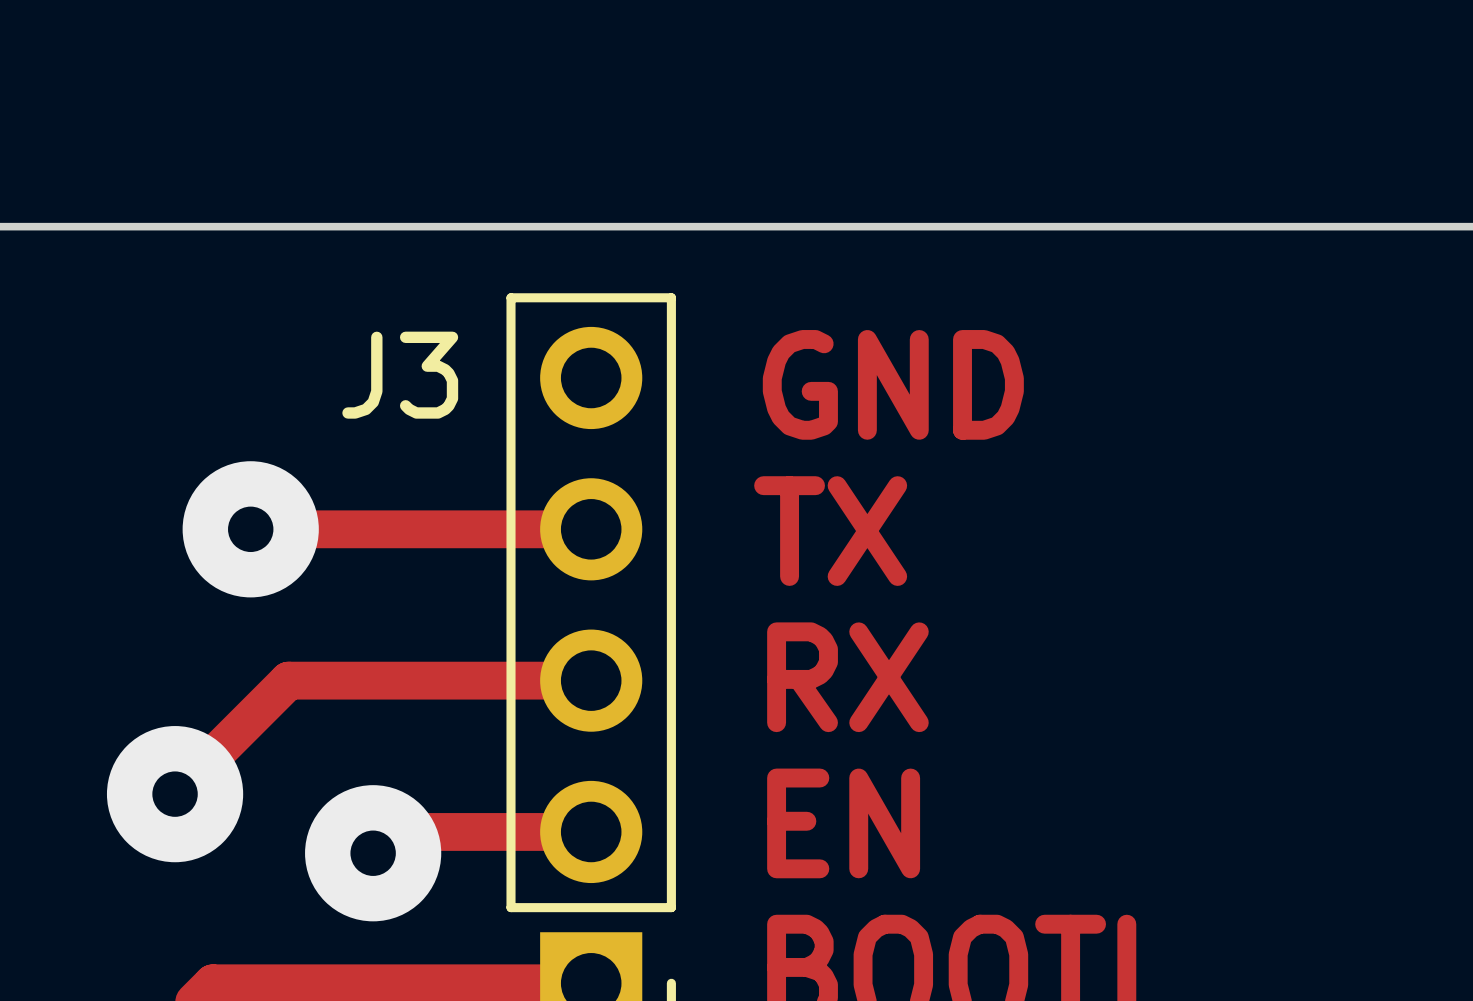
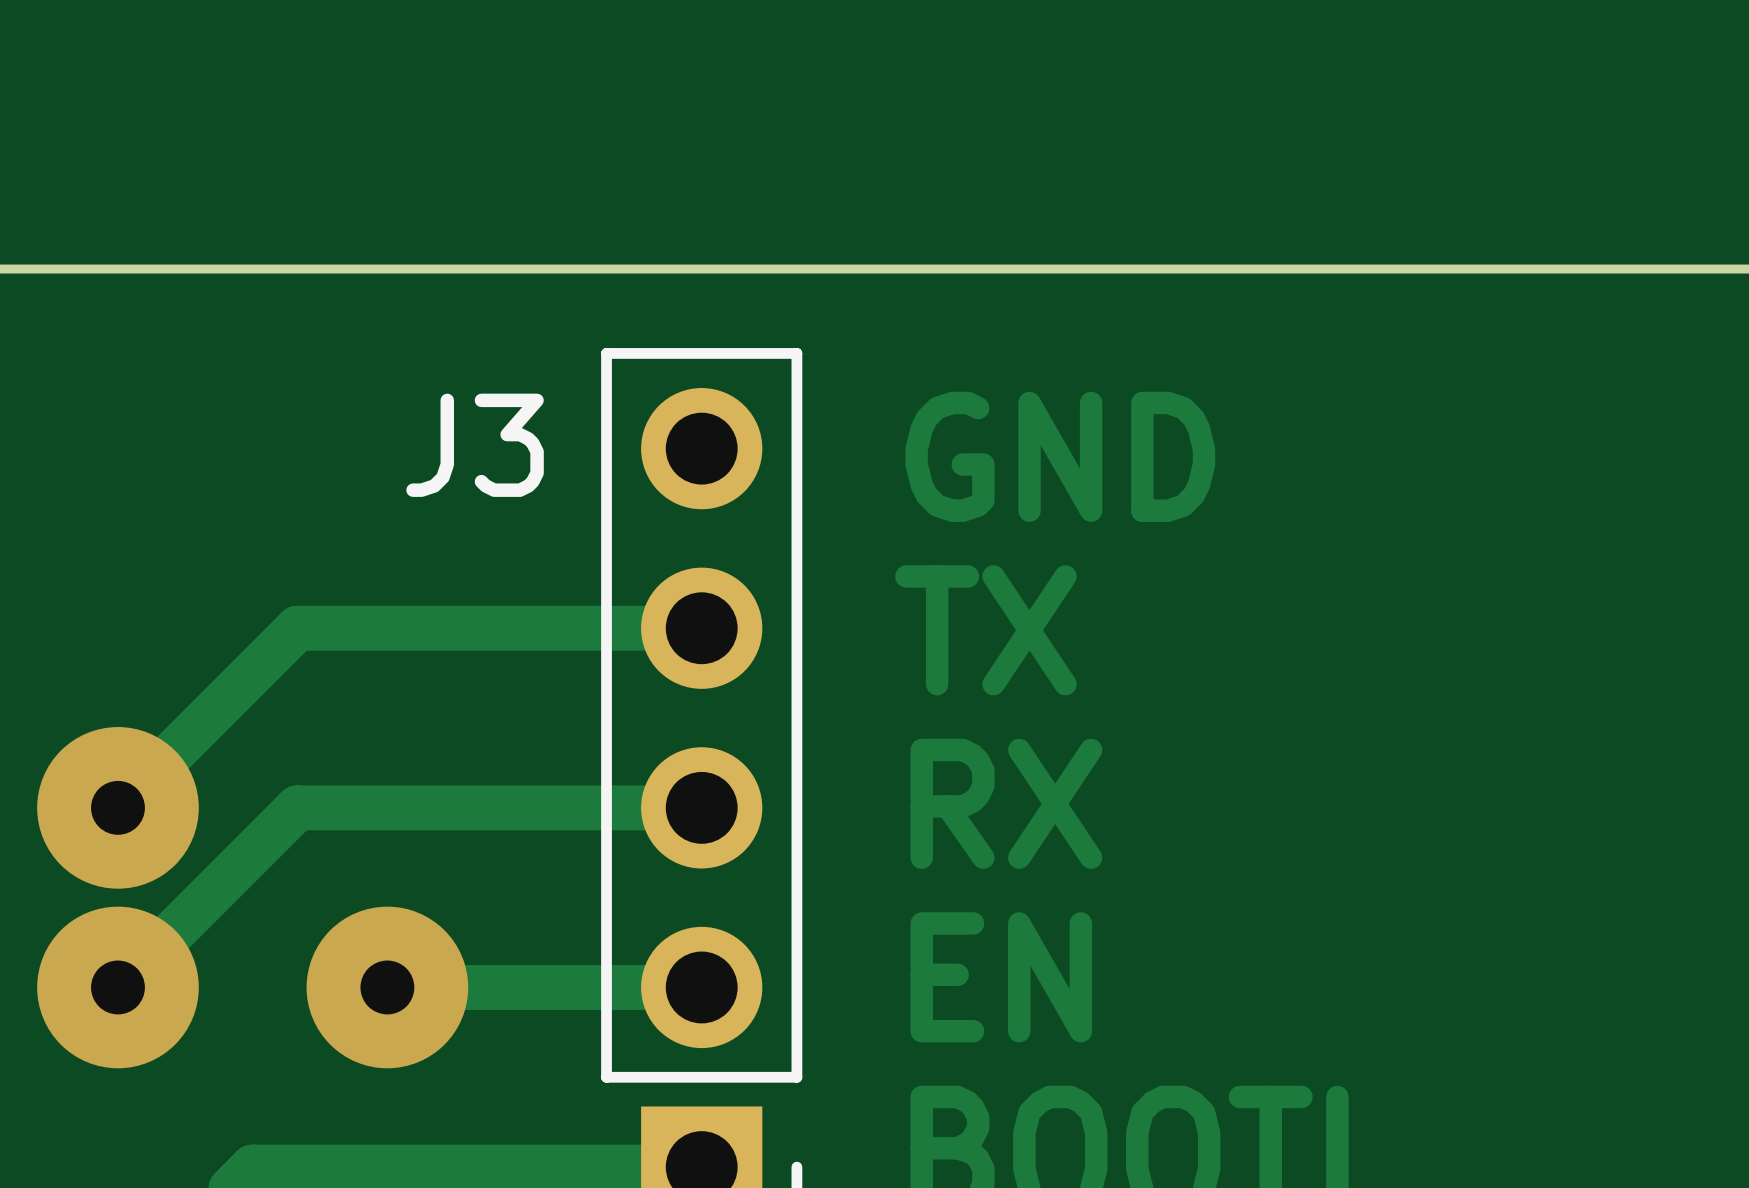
track: none -> (297, 628) (117, 807)
via: (250, 529) -> none
via: none -> (117, 807)
track: (288, 680) (175, 794) -> (342, 807) (297, 807) (117, 987)
via: (175, 794) -> none
via: none -> (117, 987)
via position: (373, 853) -> (387, 987)

